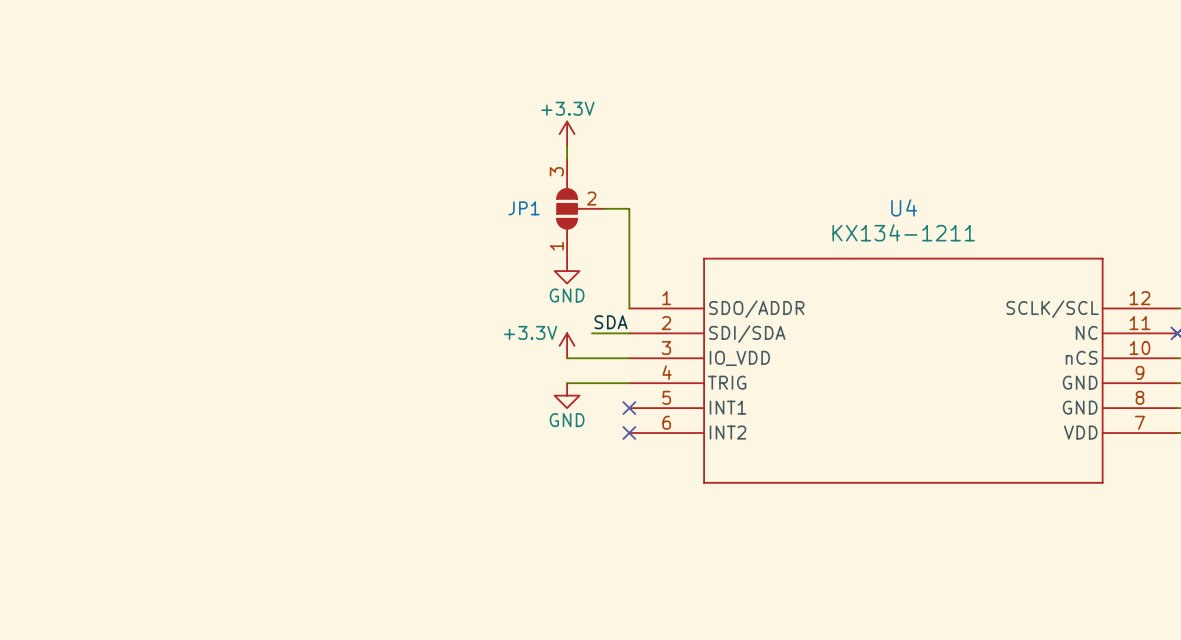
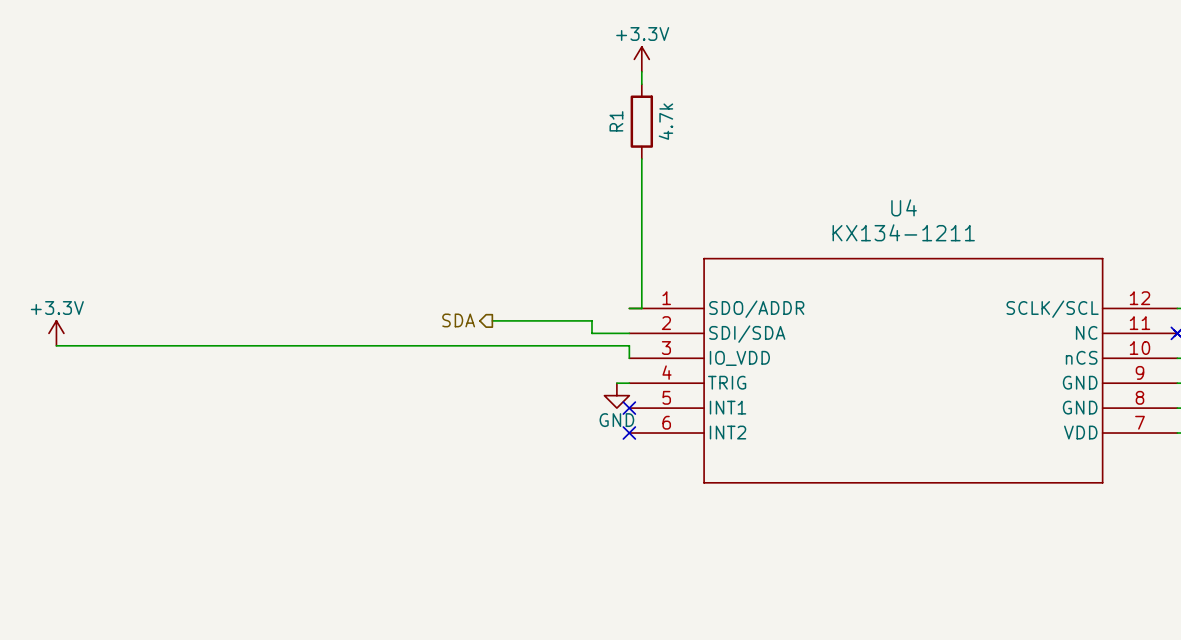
R1: none -> 4.7k (641, 121)
power symbol position: +3.3V (567, 134) -> +3.3V (641, 59)
wire: (567, 146) (567, 159) -> (641, 71) (641, 84)
JP1: (580, 208) -> none
wire: (604, 208) (629, 208) (629, 308) -> (641, 159) (641, 308) (629, 308)
power symbol: GND (567, 271) -> none
hierarchical label: none -> SDA (458, 320)
wire: none -> (492, 320) (591, 320) (591, 333)
label: SDA (611, 322) -> none
power symbol: none -> +3.3V (56, 333)
power symbol: +3.3V (567, 345) -> none
wire: (567, 358) (629, 358) -> (56, 345) (629, 345) (629, 358)
wire: (567, 383) (616, 383) -> none
power symbol position: GND (567, 395) -> GND (616, 395)

